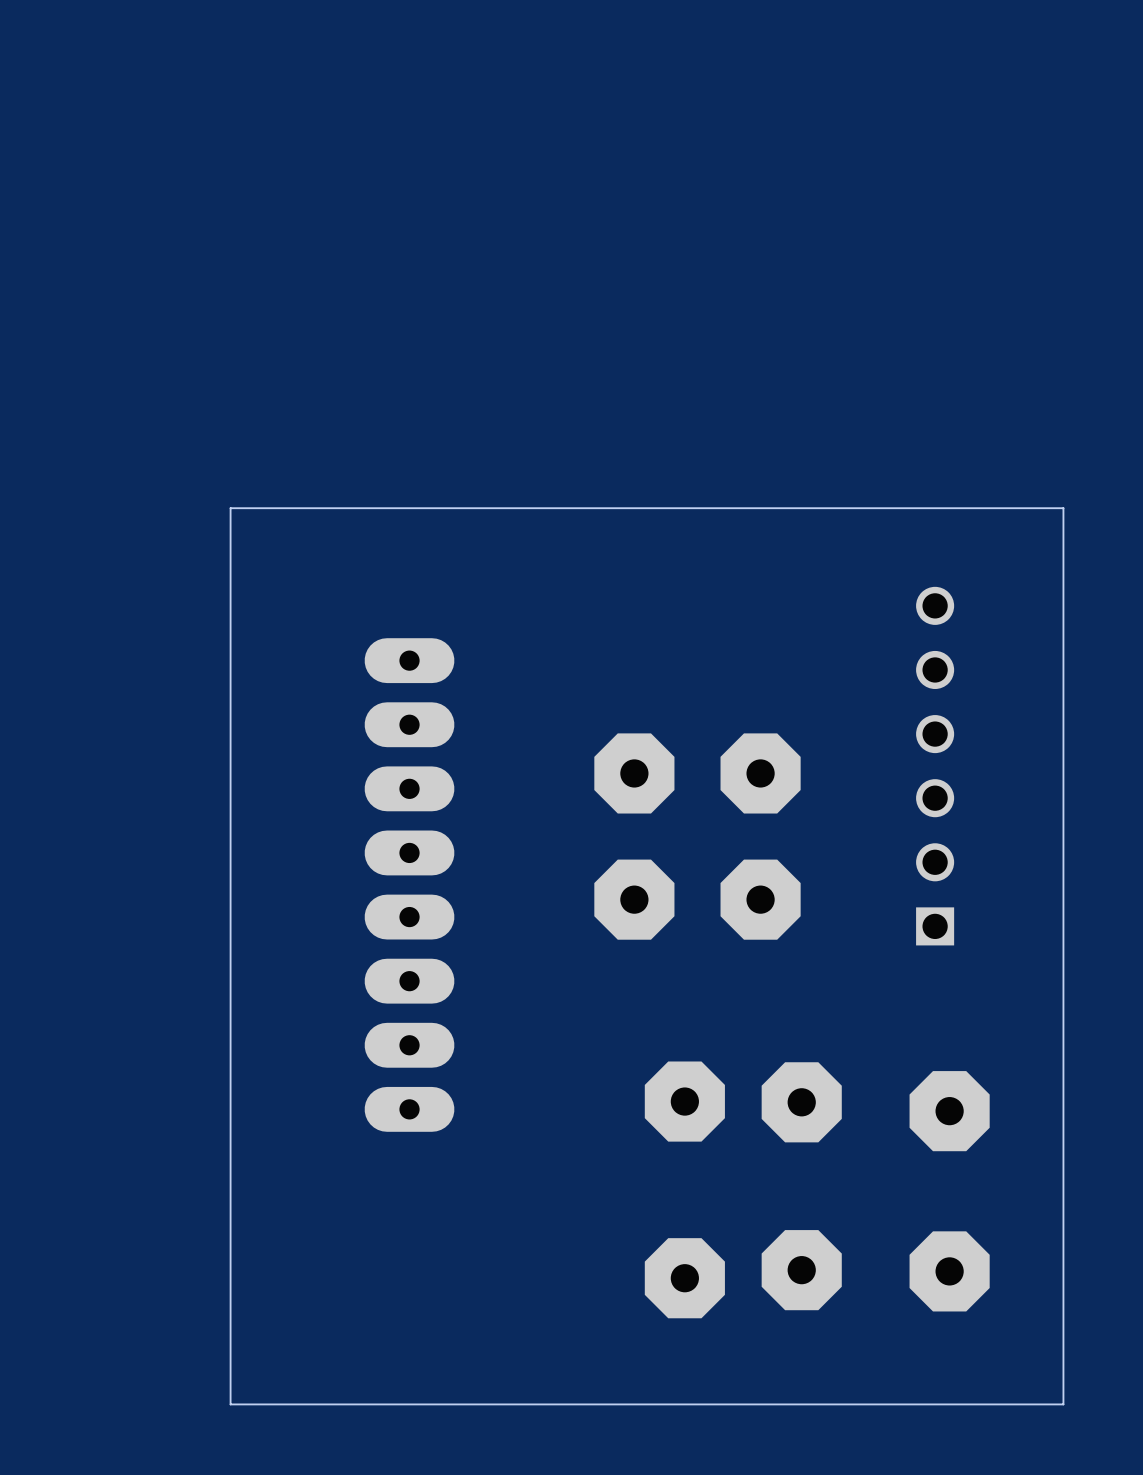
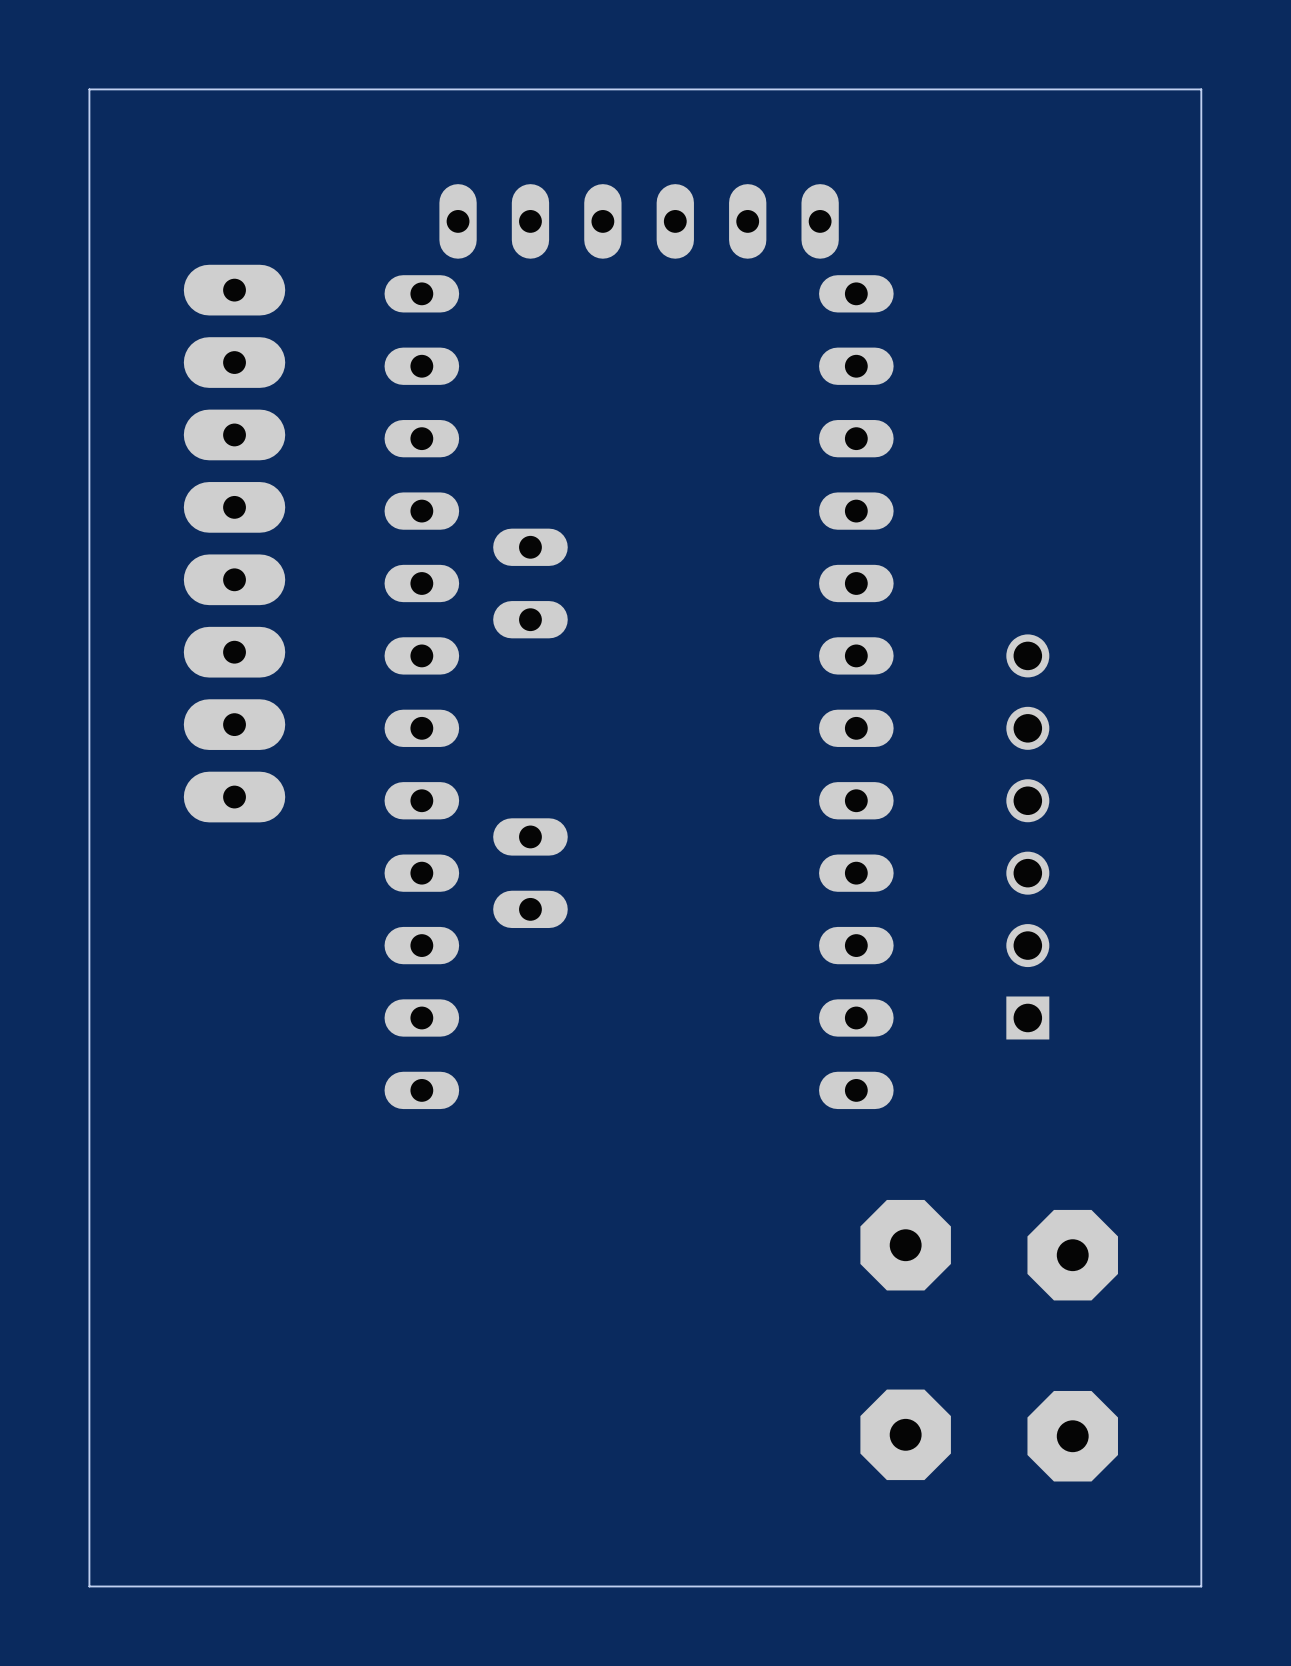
board edge: (1063, 508) (230, 508) (230, 1404) -> (1201, 574) (1201, 89) (89, 89) (89, 1586) (260, 1586)
part: none -> (639, 646)
part position: (935, 766) -> (1027, 836)
part: (634, 773) -> none
part: (760, 773) -> none
part position: (409, 885) -> (234, 543)
part: (634, 899) -> none
part: (760, 899) -> none
part: (684, 1101) -> none
part: (684, 1278) -> none

